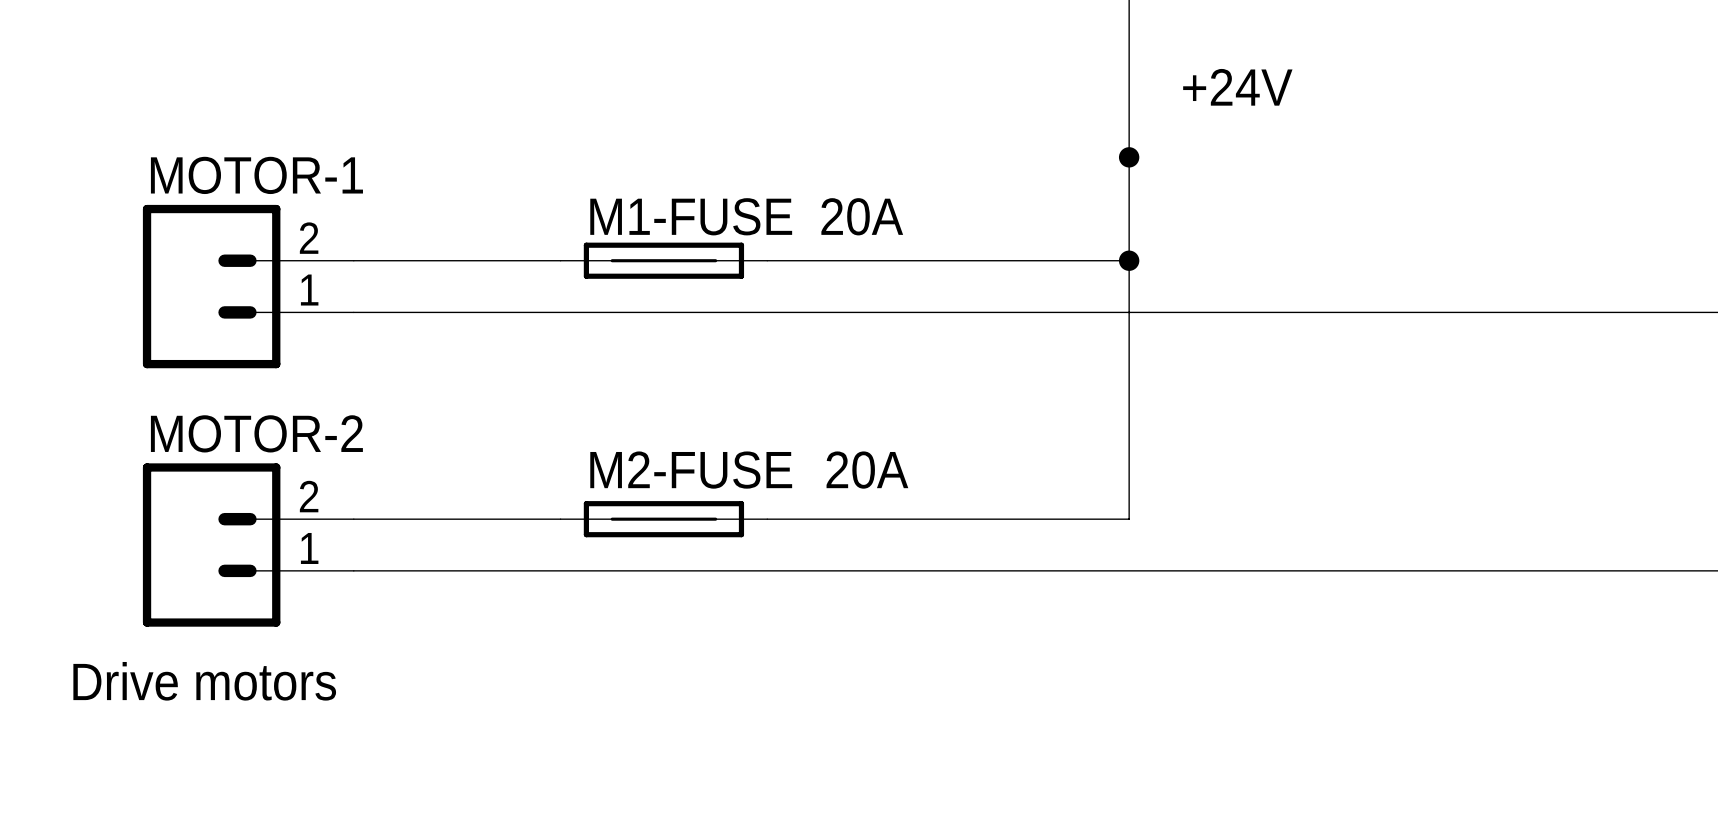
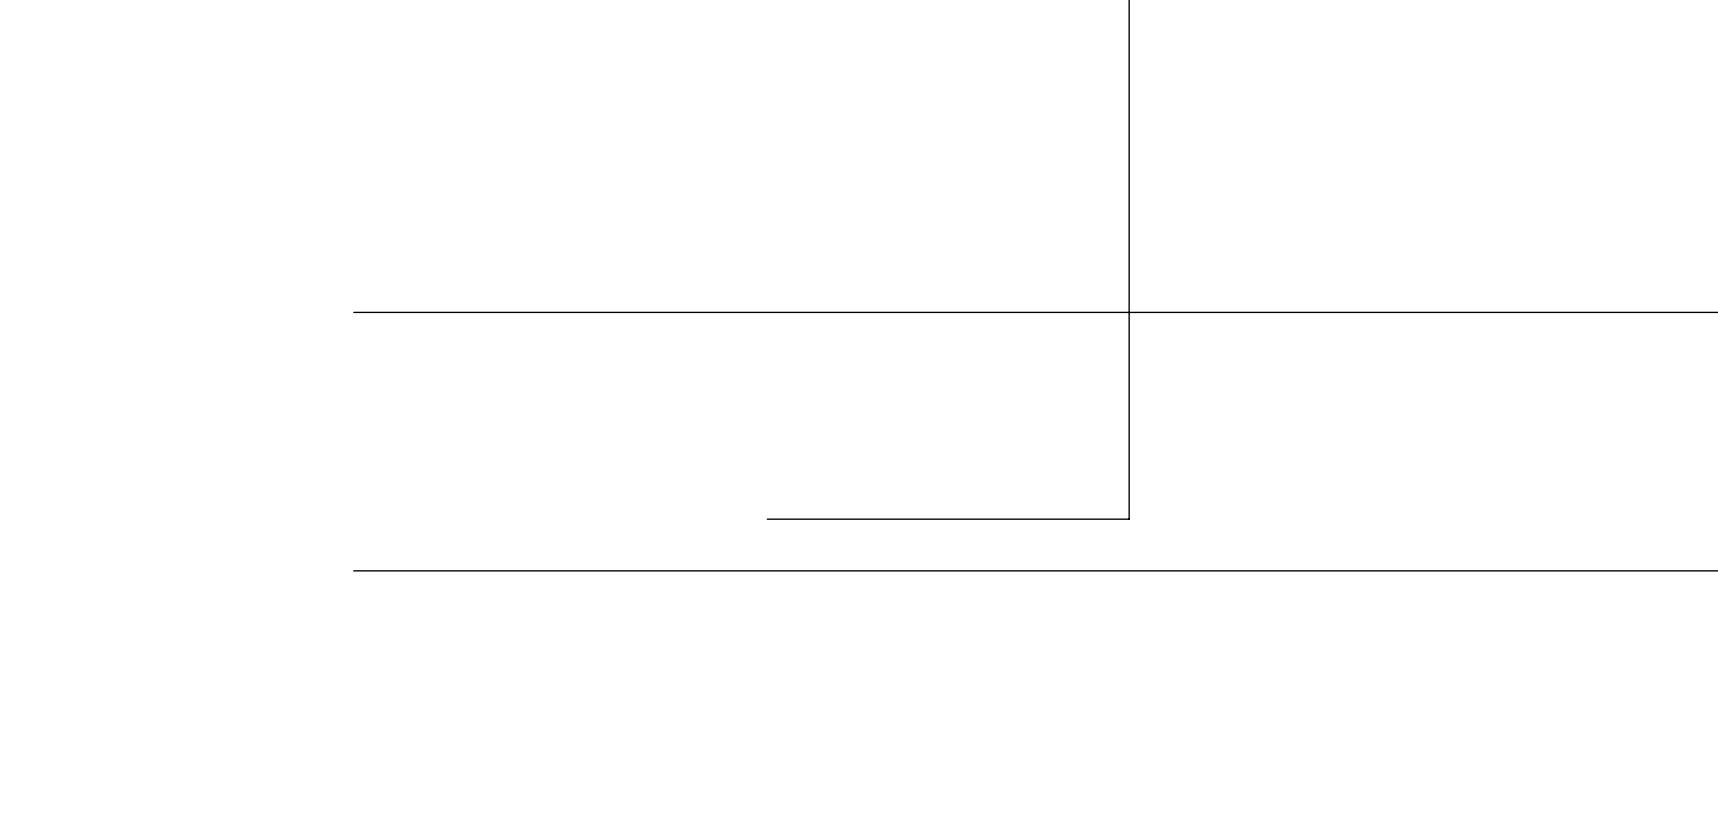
text: +24V (1237, 87) -> none
junction: (1129, 157) -> none
wire: (353, 260) (560, 260) -> none
M1-FUSE: 20A (663, 260) -> none
wire: (767, 260) (1129, 260) -> none
junction: (1129, 260) -> none
MOTOR-1: (248, 286) -> none
wire: (353, 519) (560, 519) -> none
M2-FUSE: 20A (663, 519) -> none
MOTOR-2: (248, 545) -> none
text: Drive motors (204, 681) -> none

